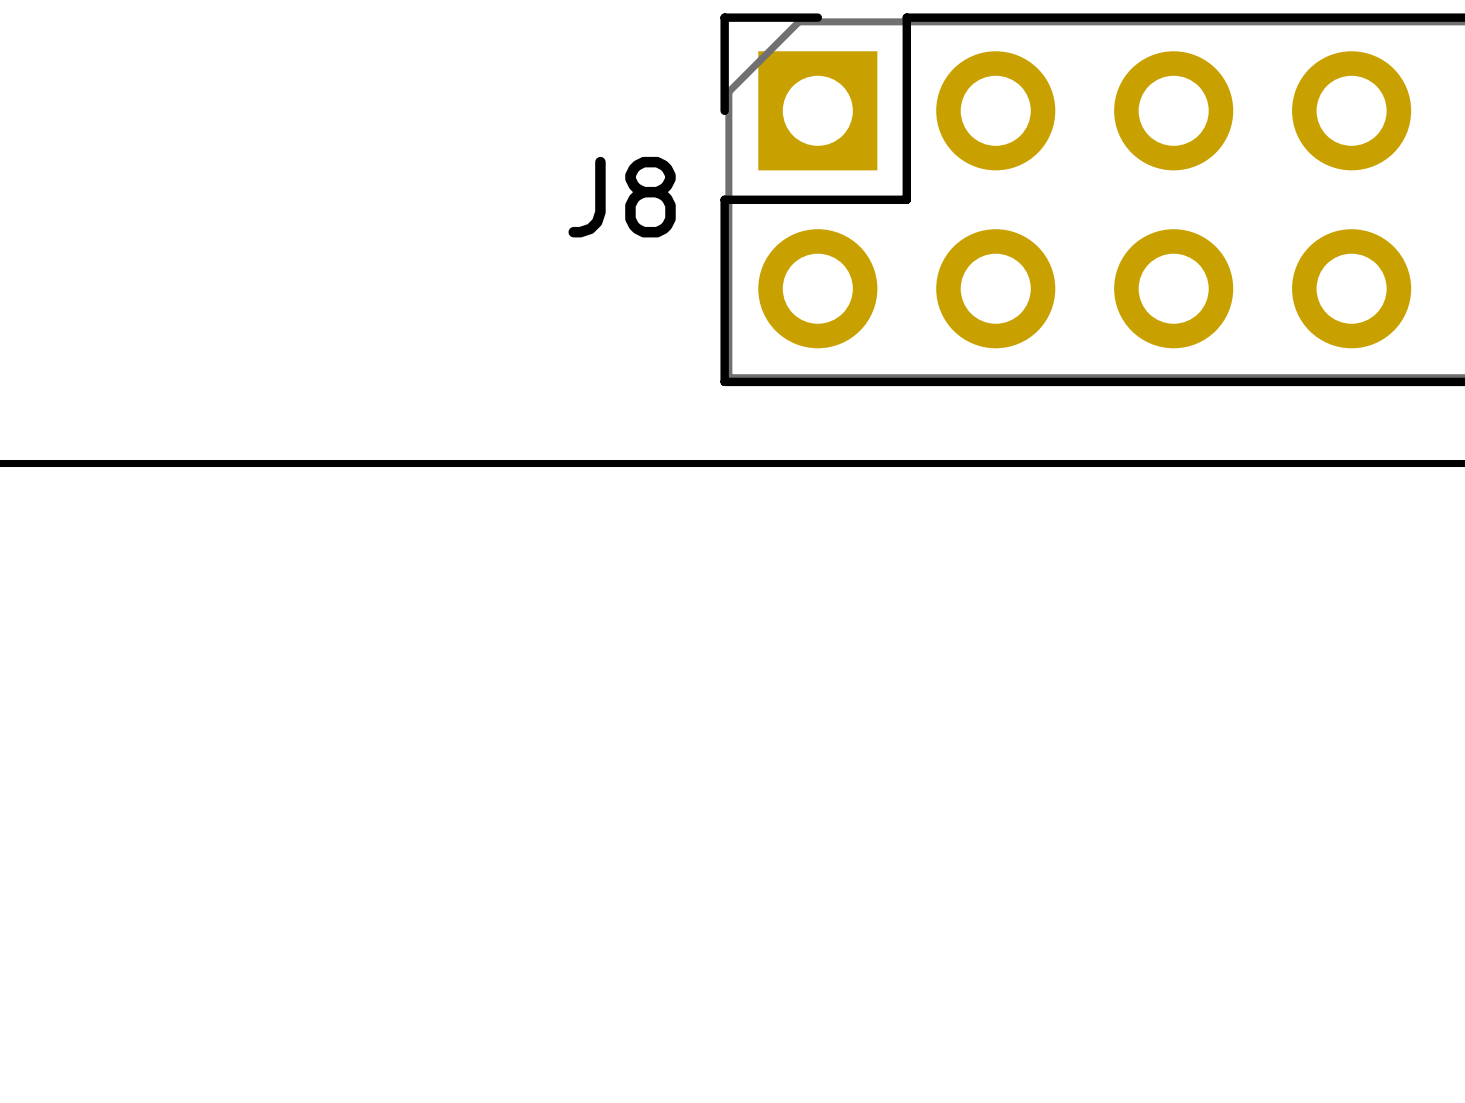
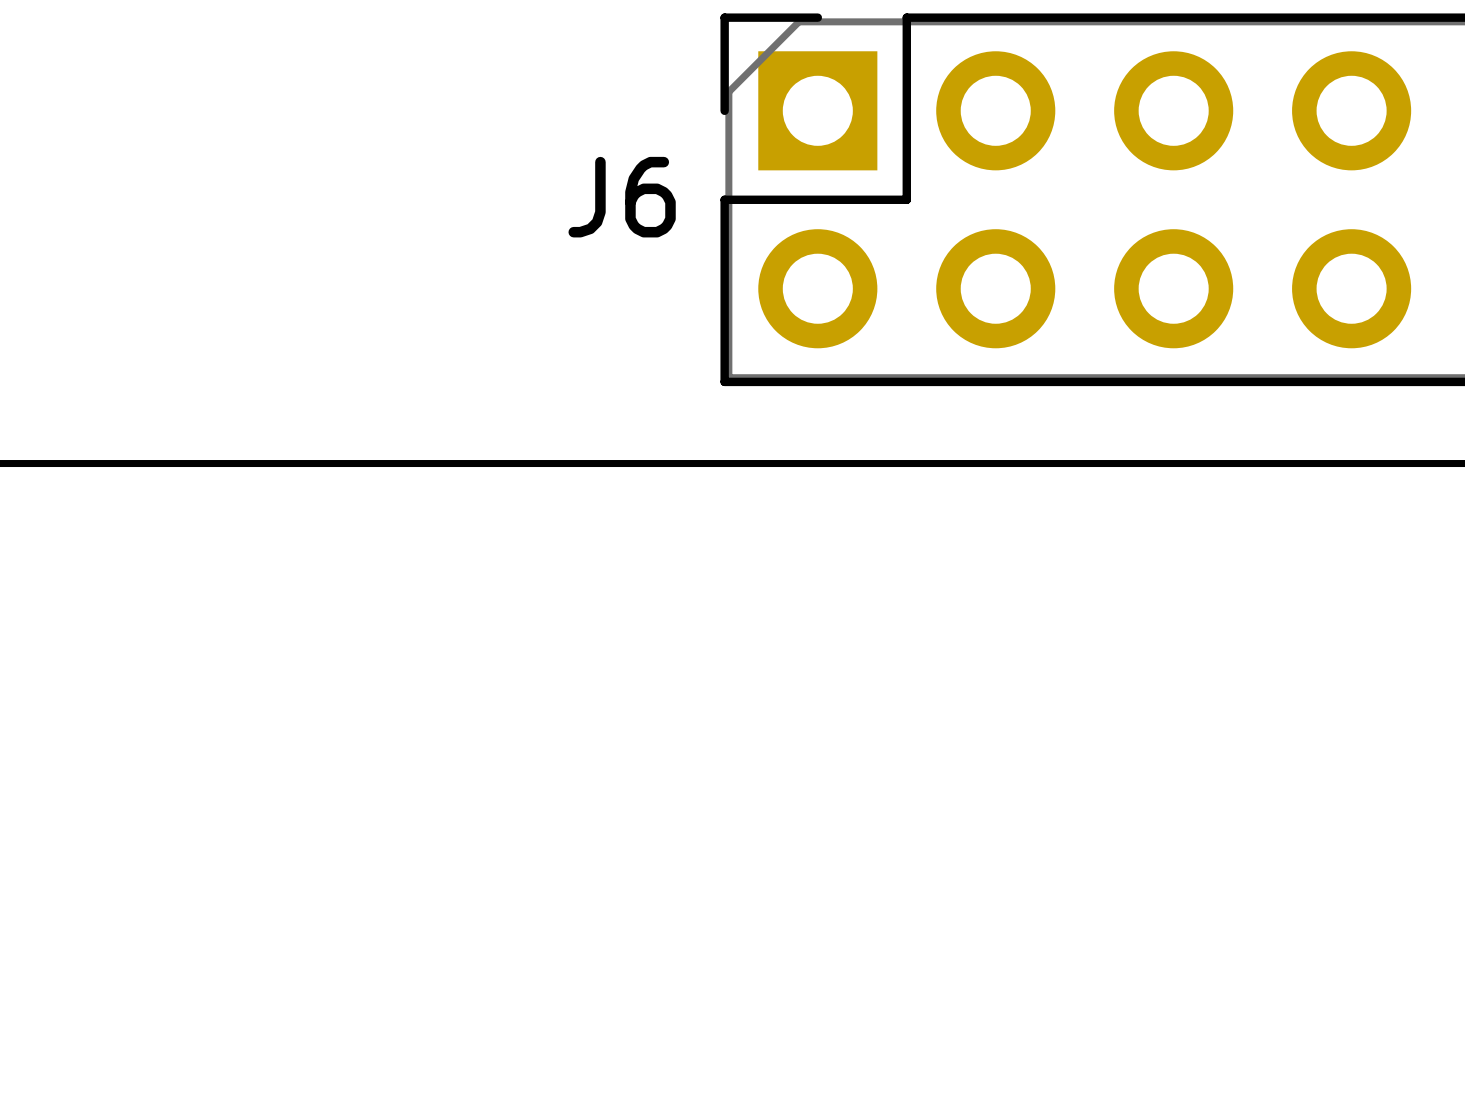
J8 name: J8 (622, 197) -> J6 (622, 197)

